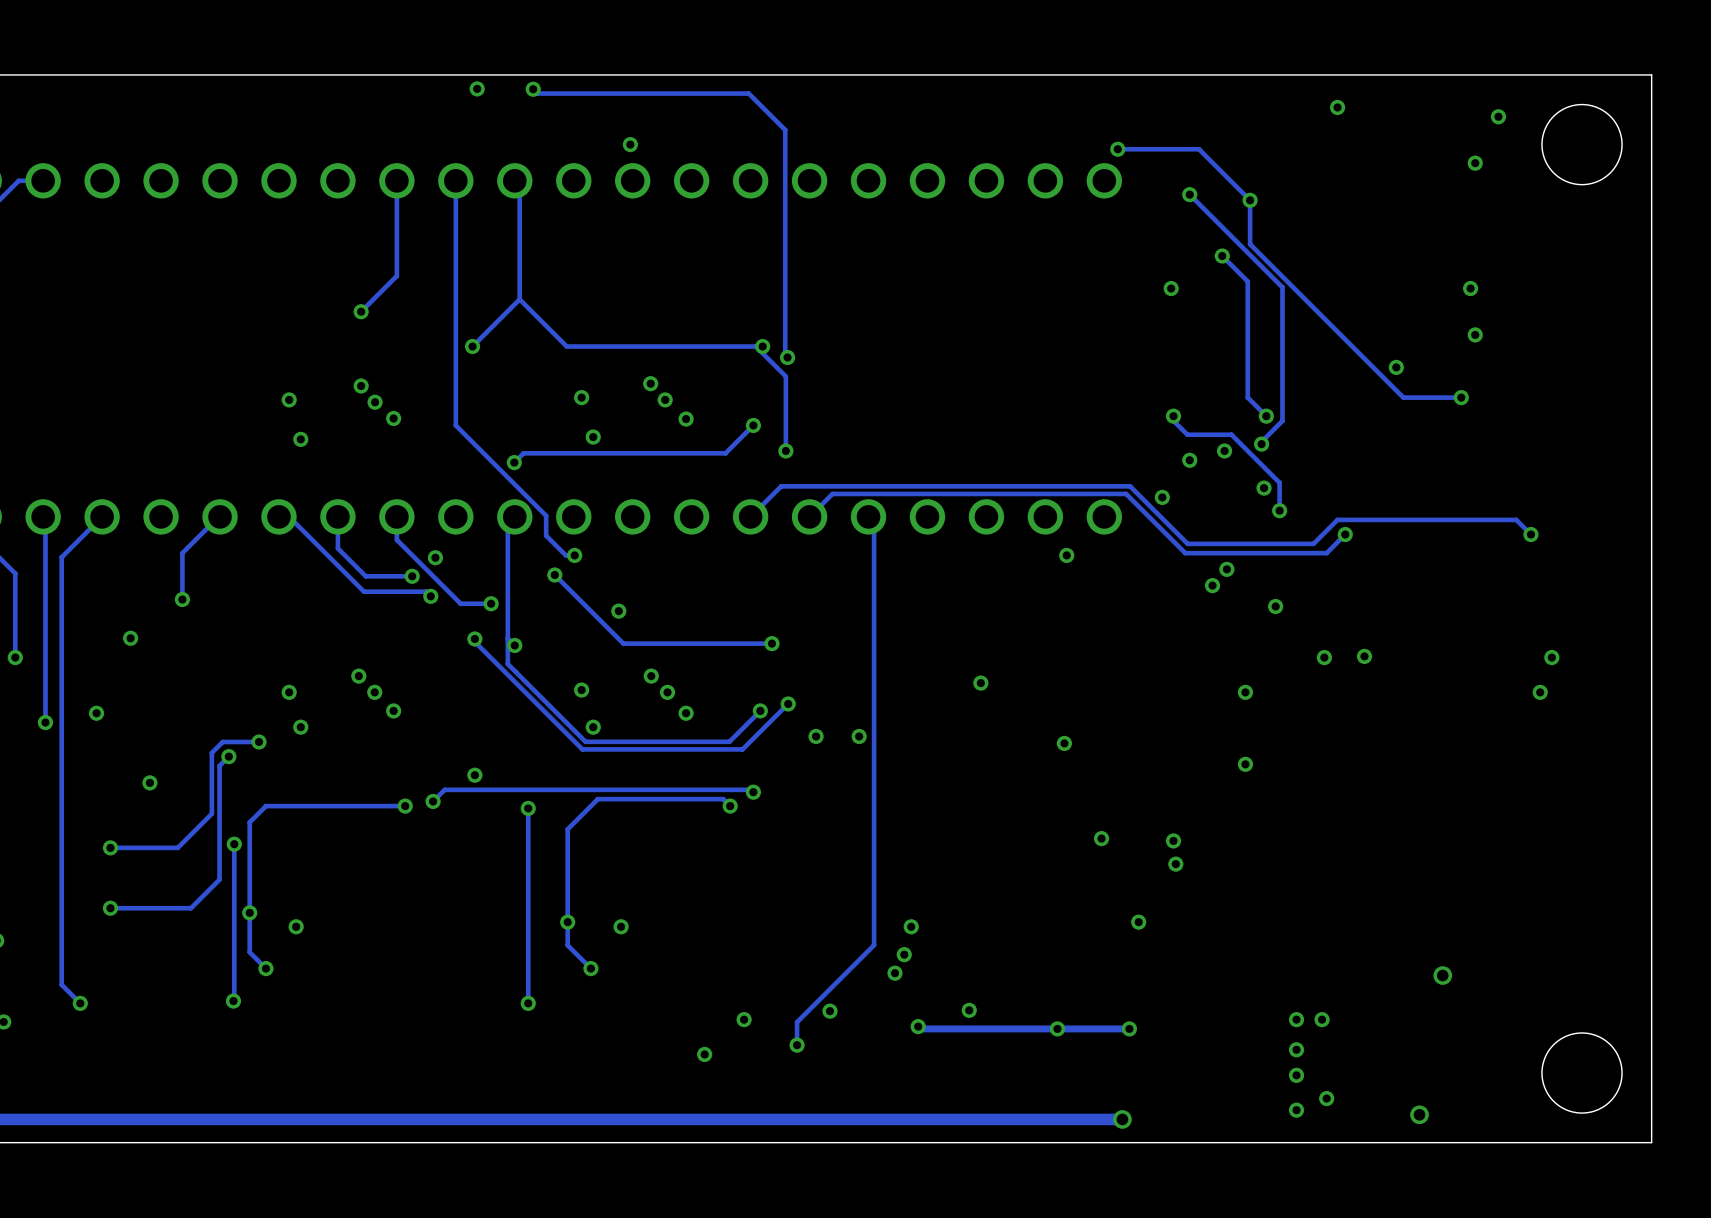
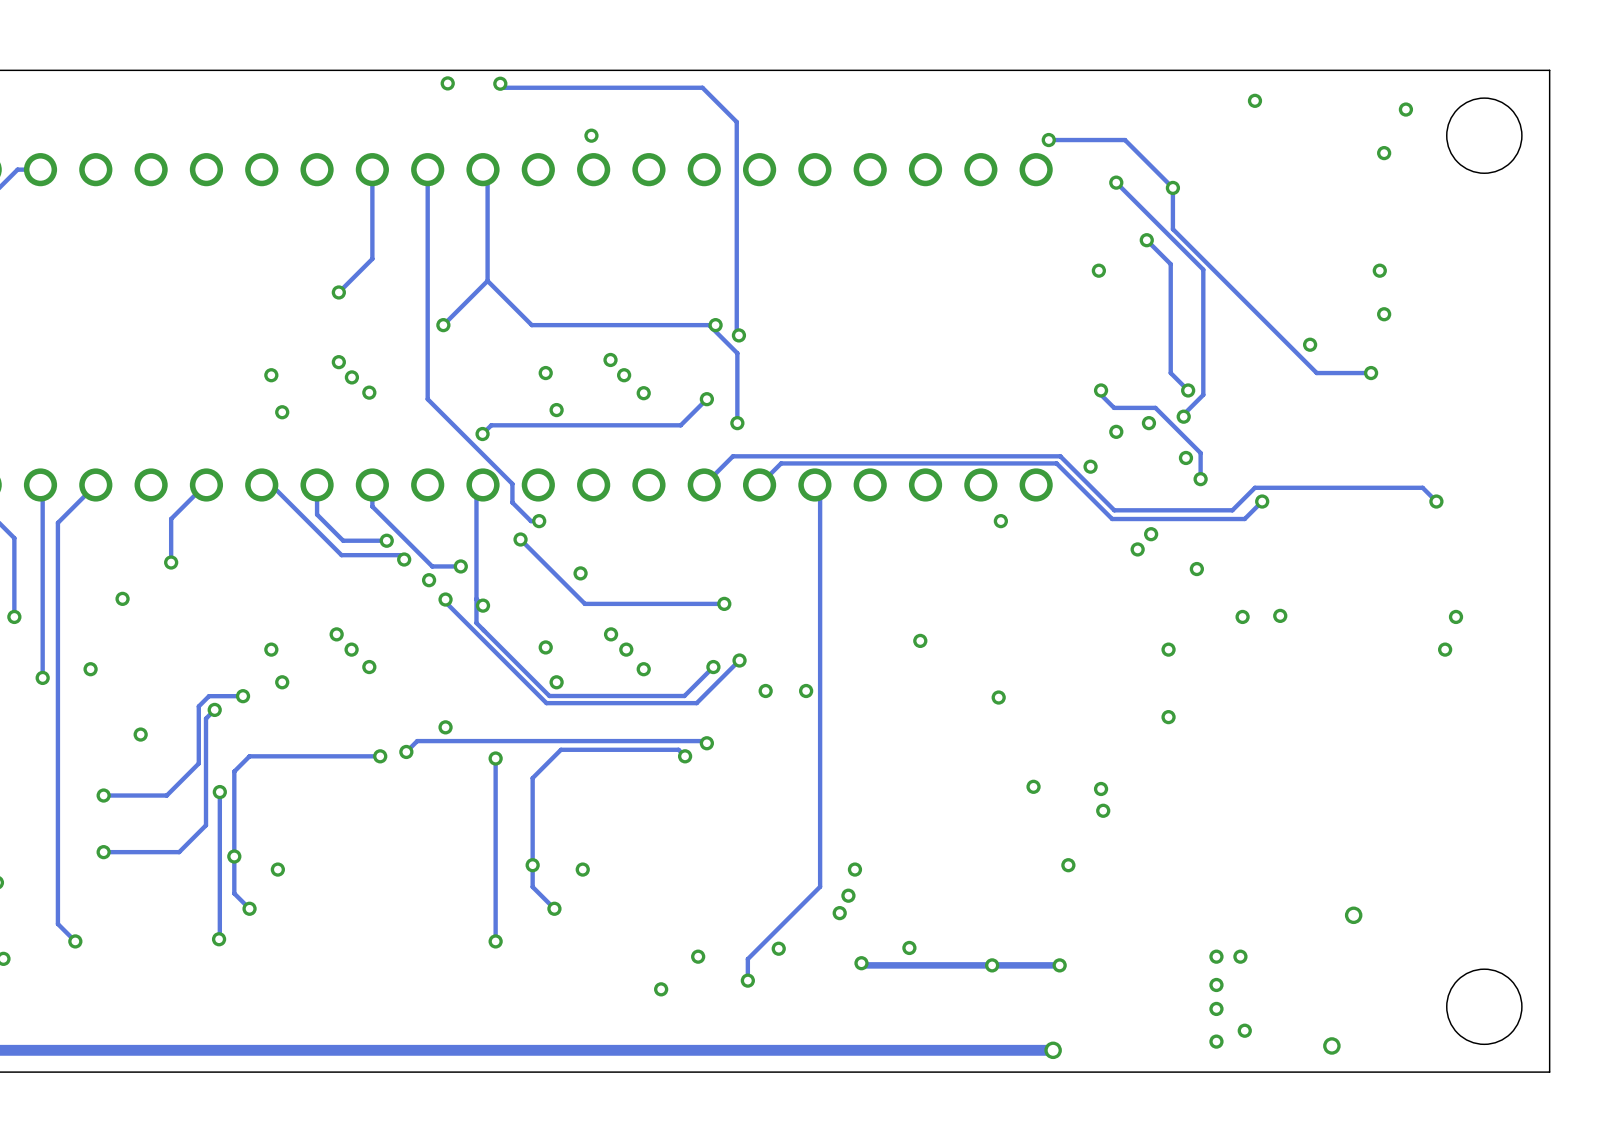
via position: (435, 557) -> (429, 580)

